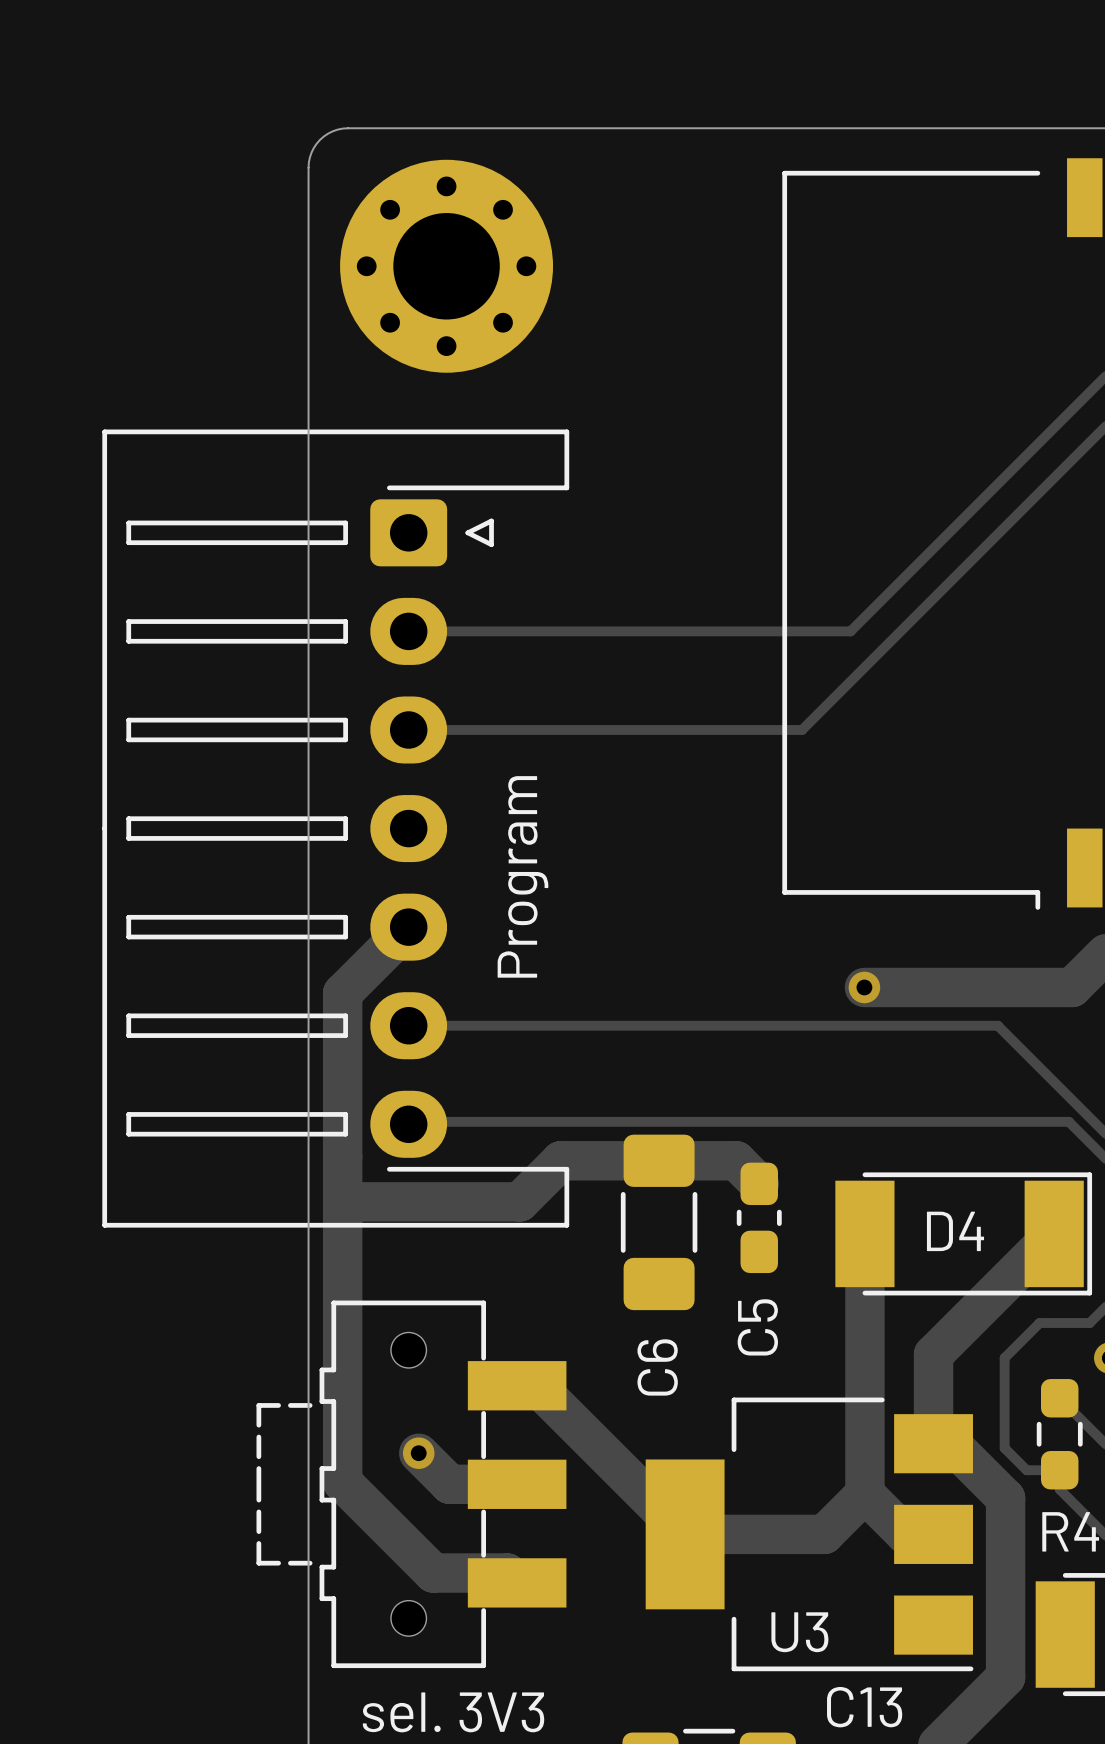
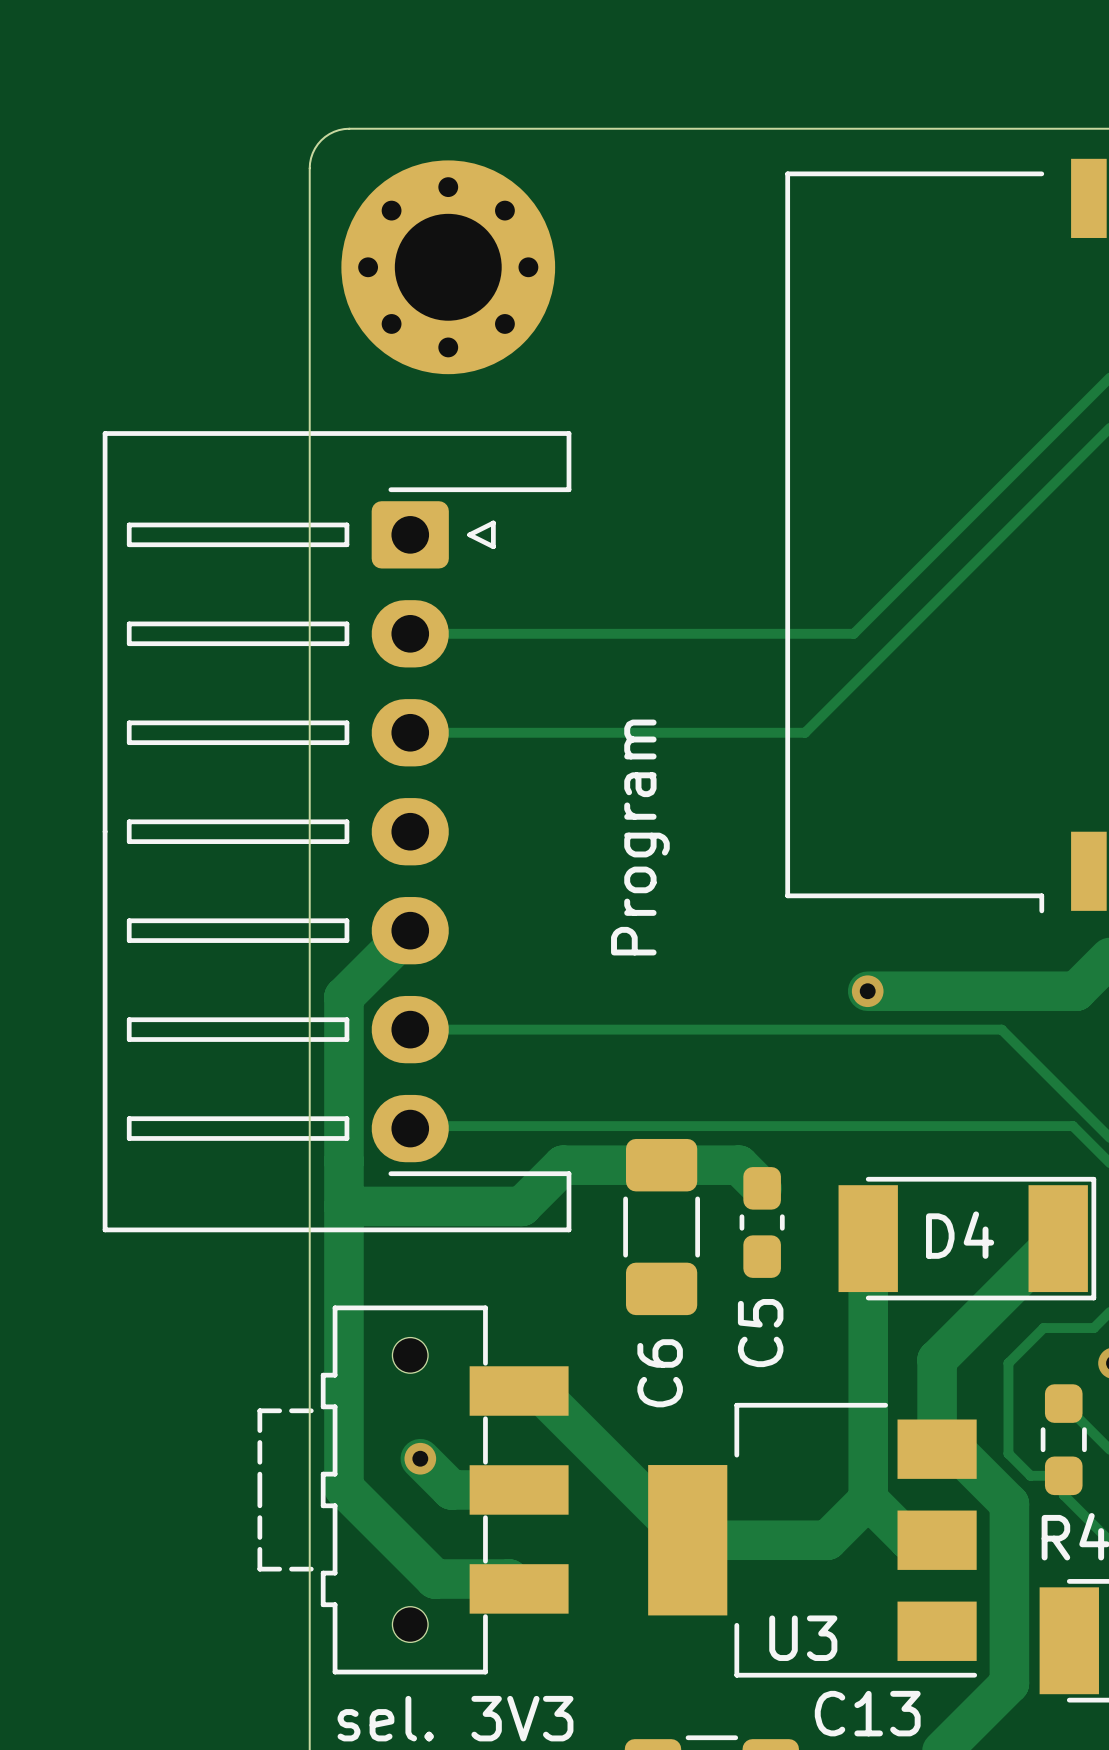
Program name position: Program (522, 876) -> Program (640, 837)

